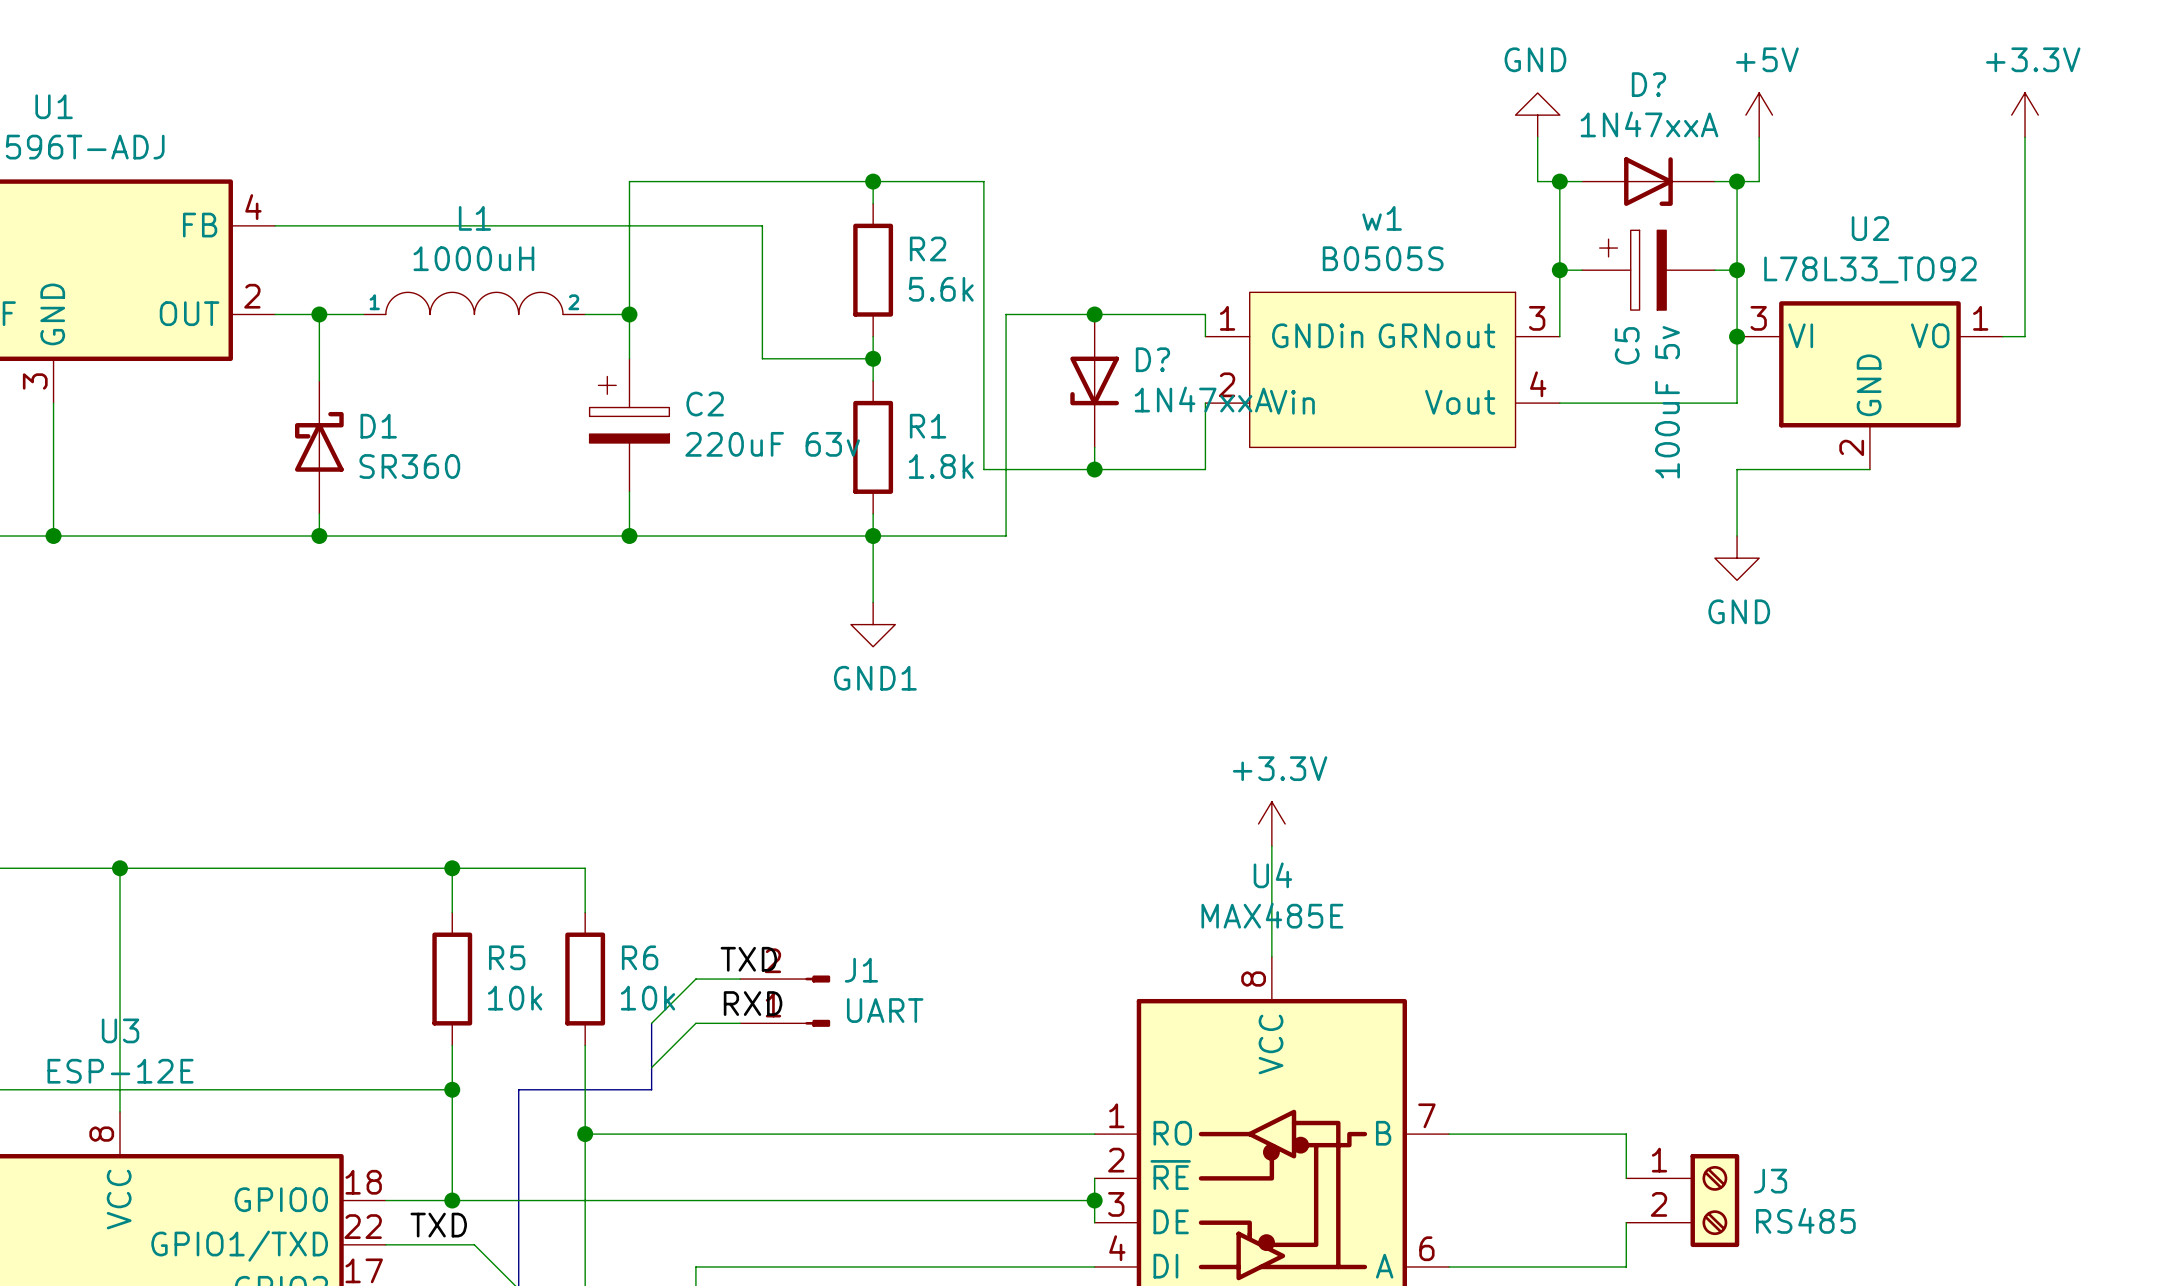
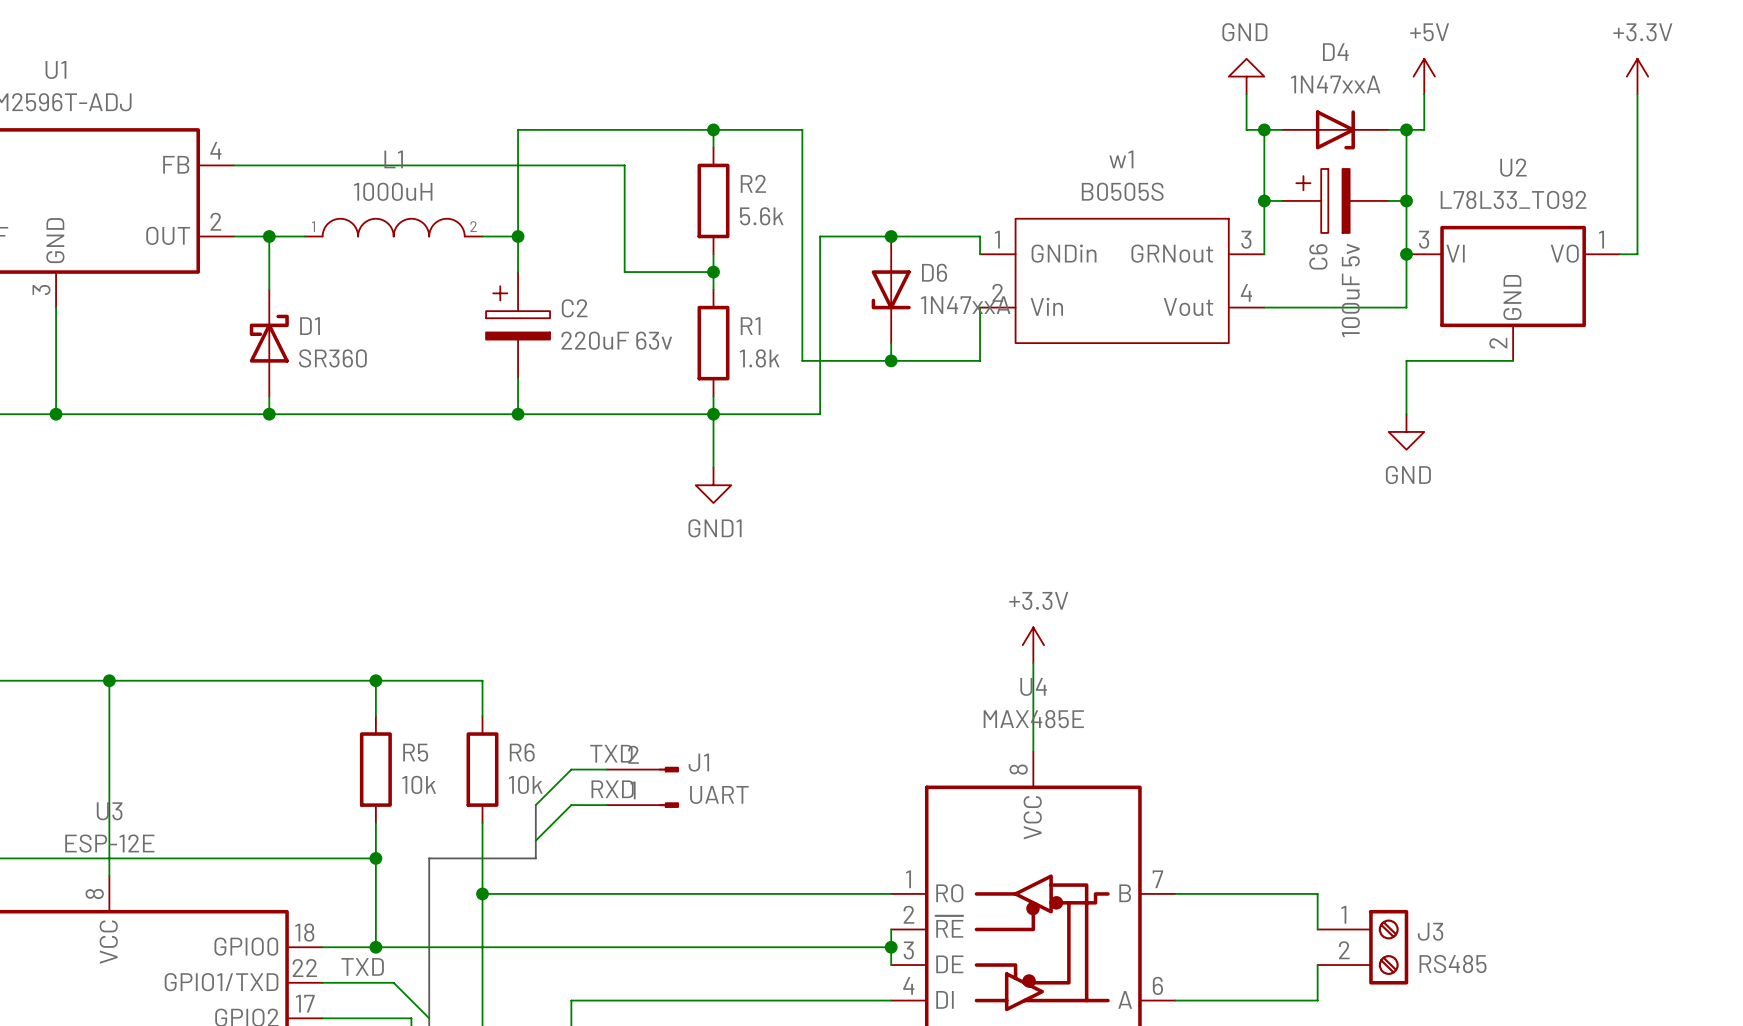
D? name: D? (1648, 84) -> D4 (1335, 52)
C5 name: C5 (1627, 345) -> C6 (1318, 256)
D? name: D? (1152, 359) -> D6 (934, 272)

